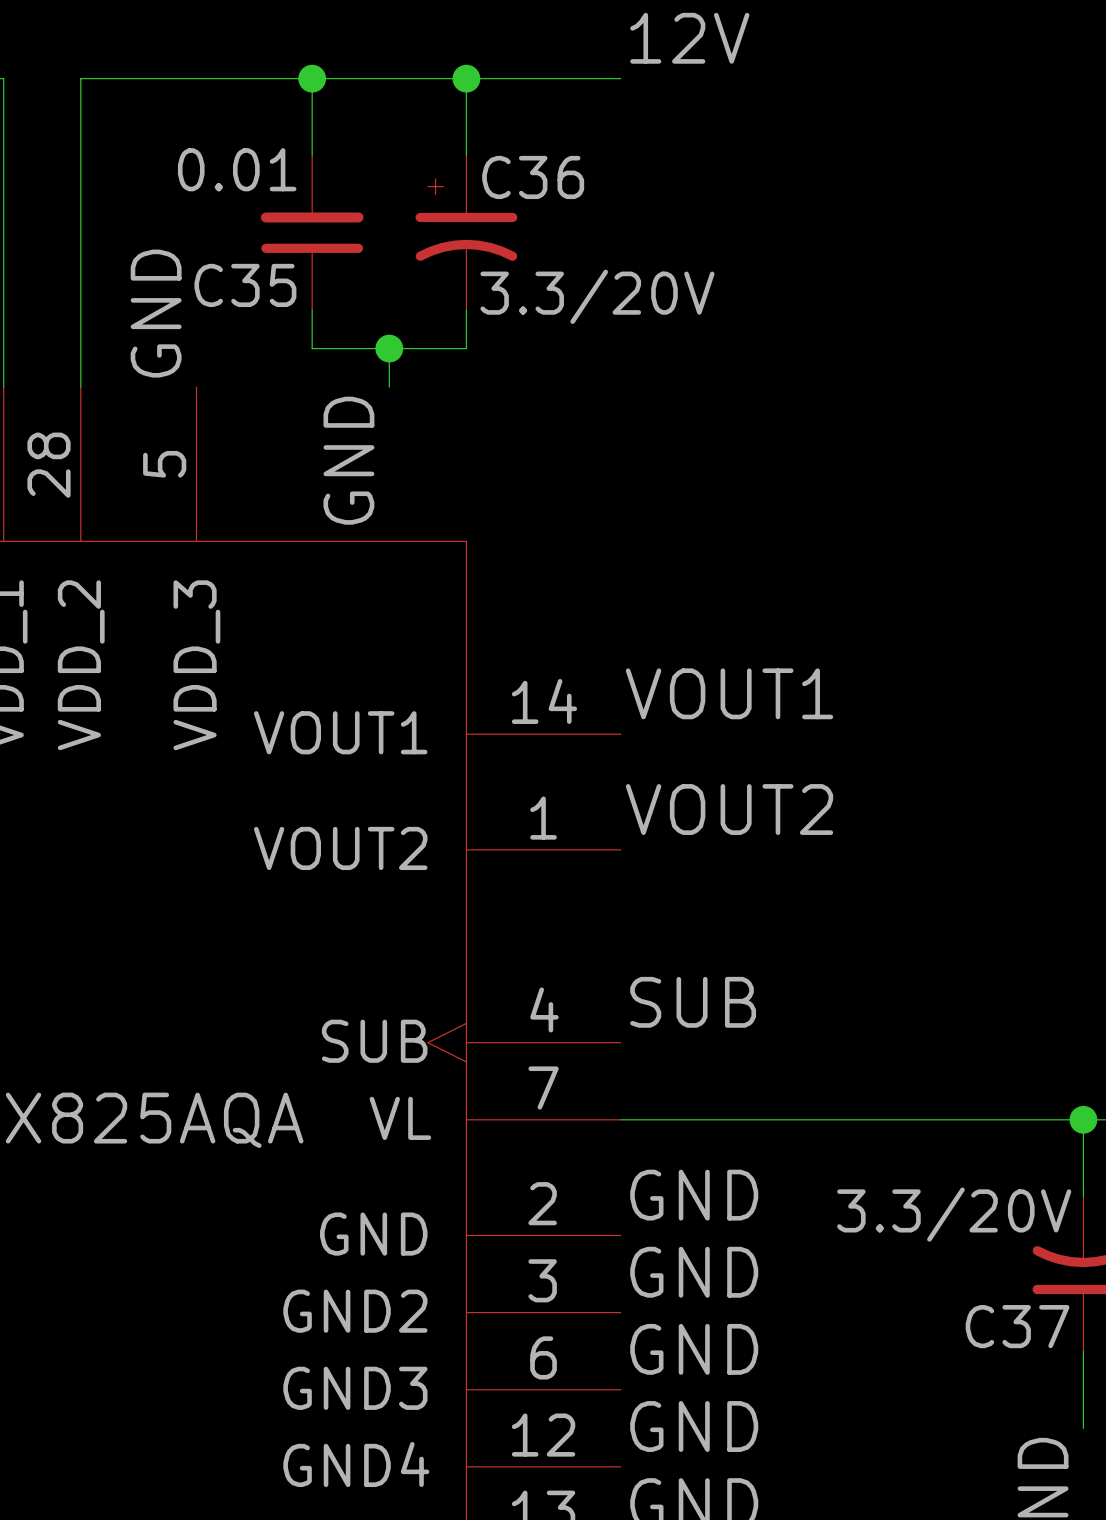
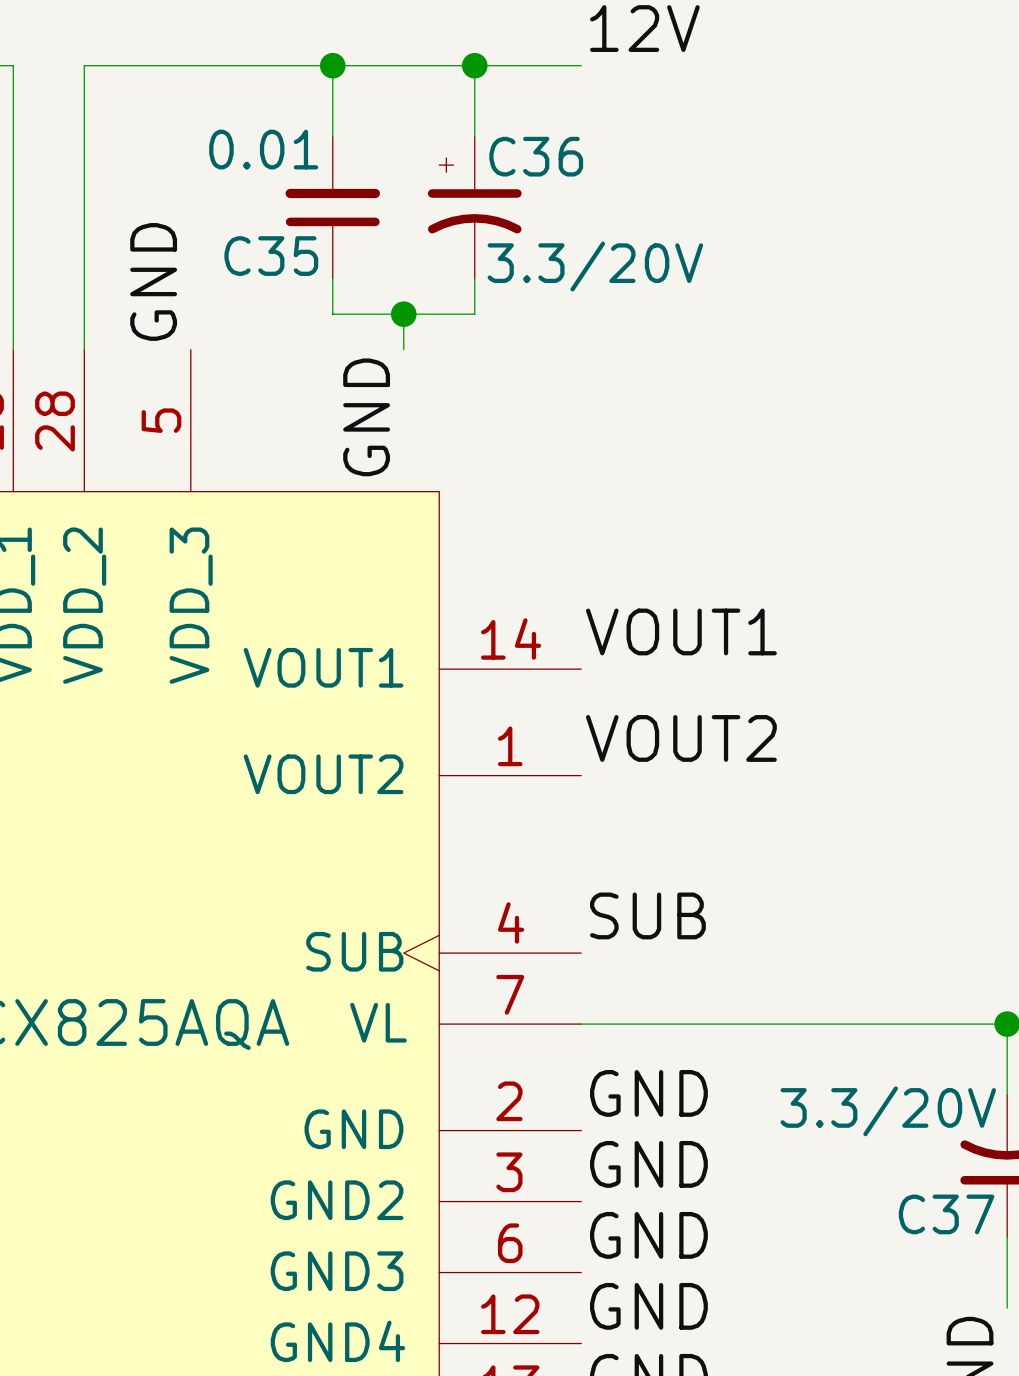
wire: (312, 78) (312, 155) -> (332, 65) (332, 136)
junction position: (312, 78) -> (332, 65)
wire: (466, 78) (466, 155) -> (474, 65) (474, 136)
junction position: (466, 78) -> (474, 65)
C35 position: (312, 232) -> (332, 207)
C36 position: (466, 232) -> (474, 207)
wire: (312, 310) (312, 348) (350, 348) -> (332, 278) (332, 314)
wire: (466, 310) (466, 348) -> (474, 278) (474, 314) (439, 314)
wire: (389, 348) (389, 387) -> (403, 314) (403, 349)
junction position: (389, 348) -> (403, 314)
label position: GND (348, 460) -> GND (366, 417)

